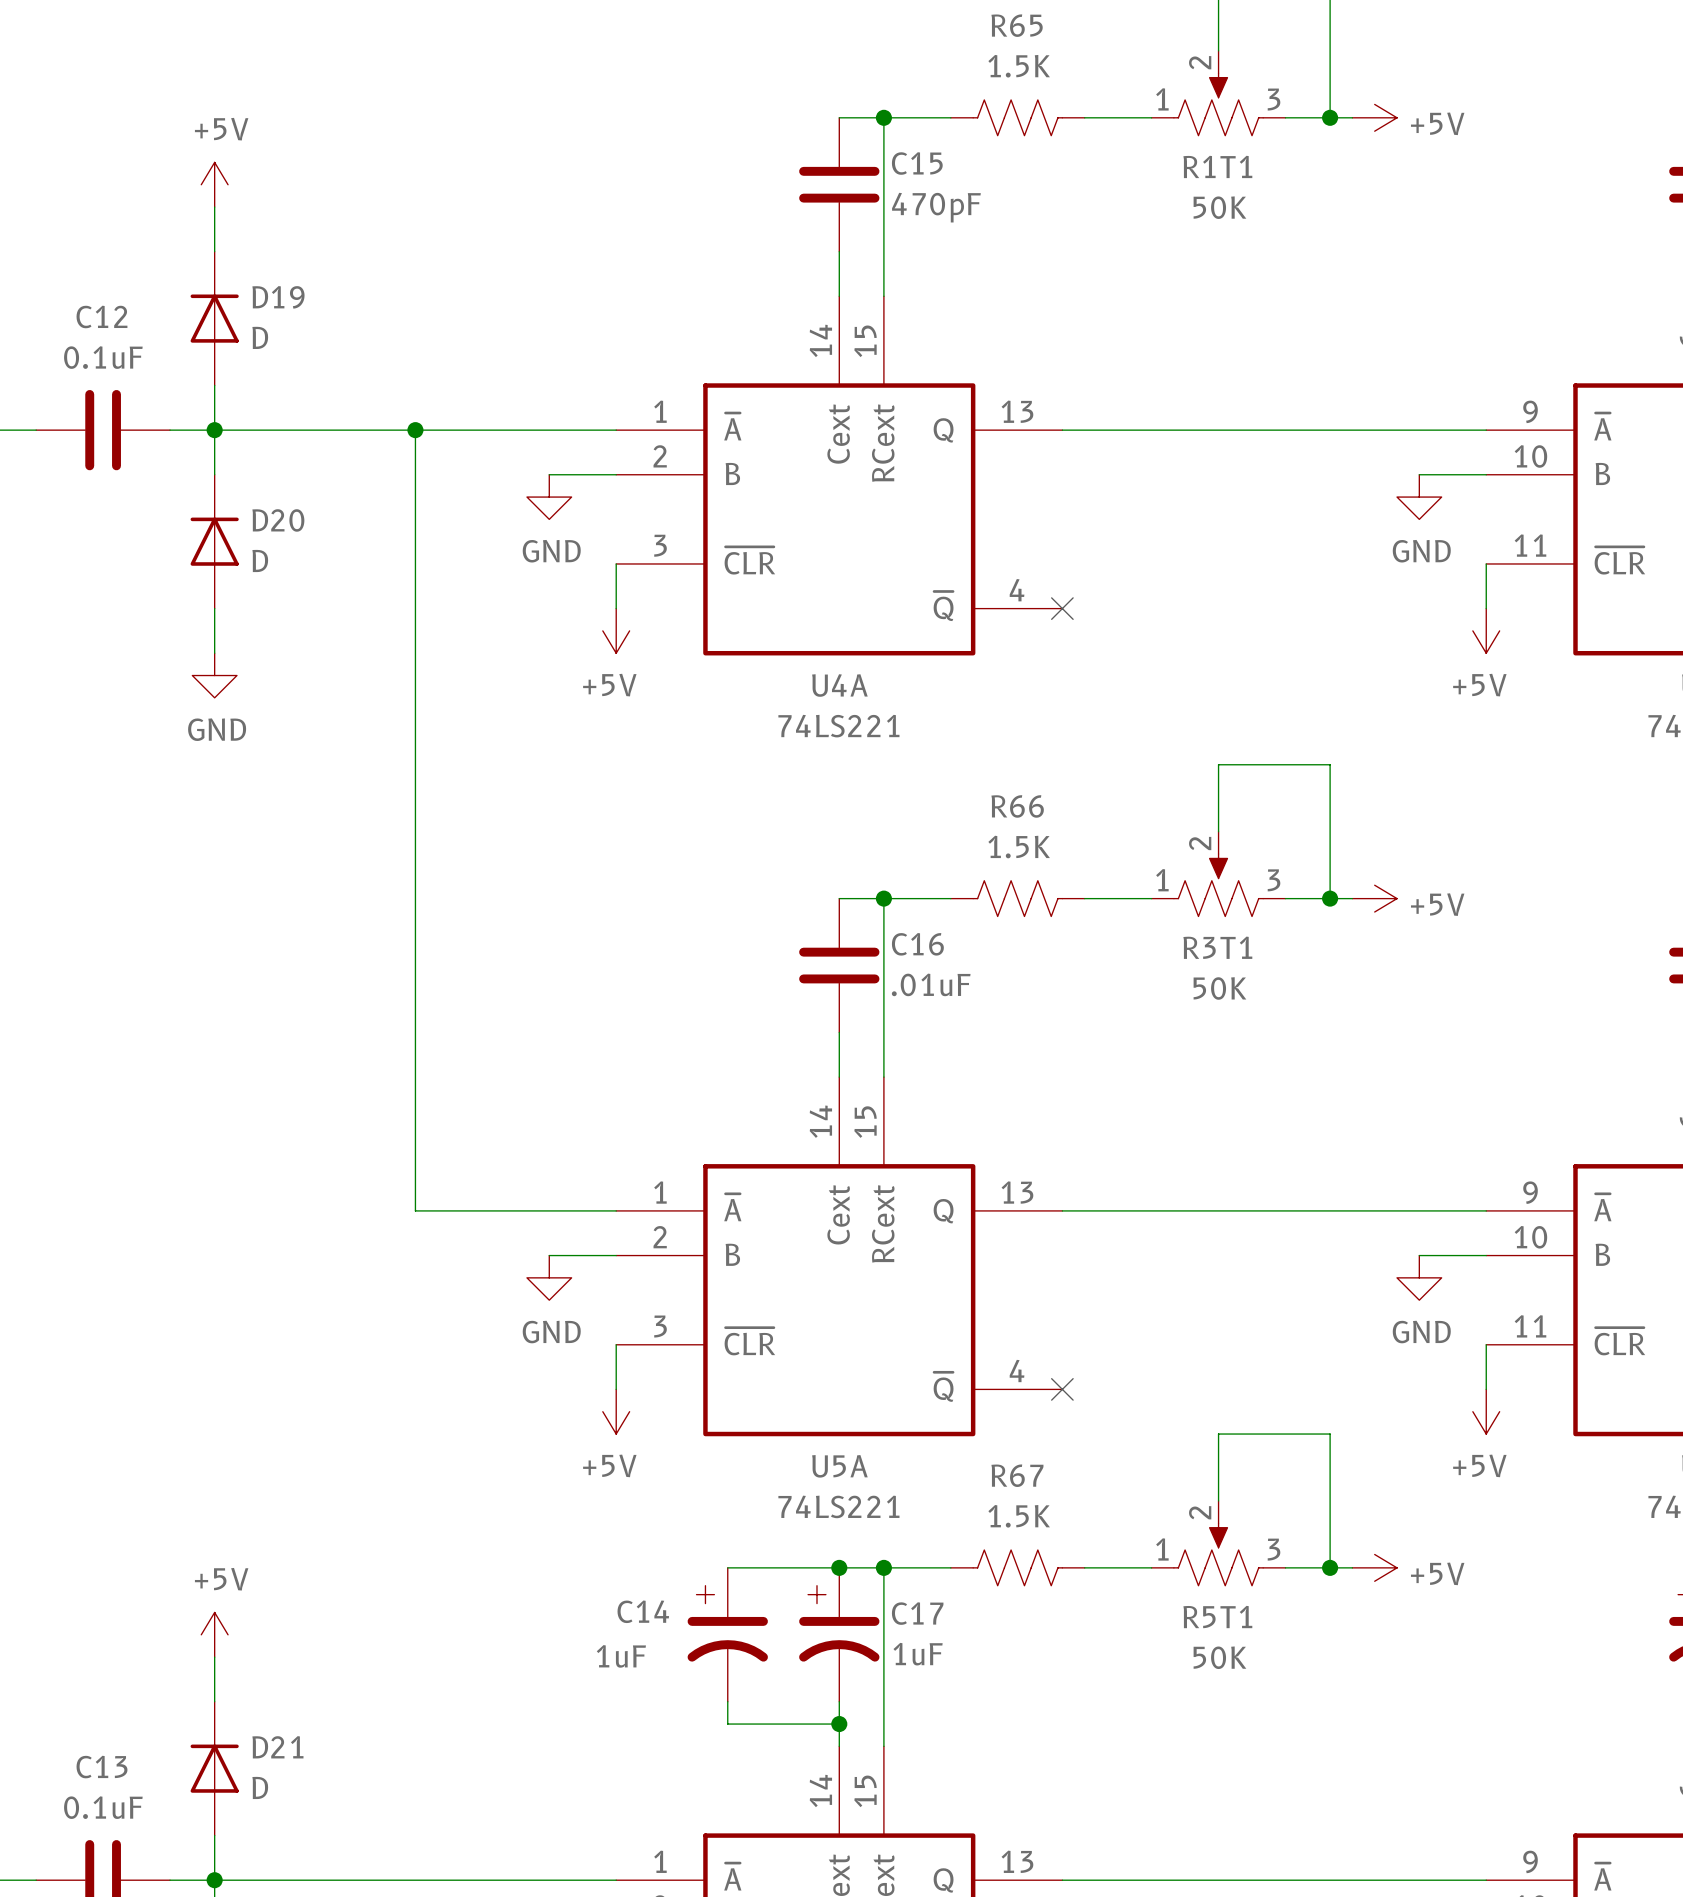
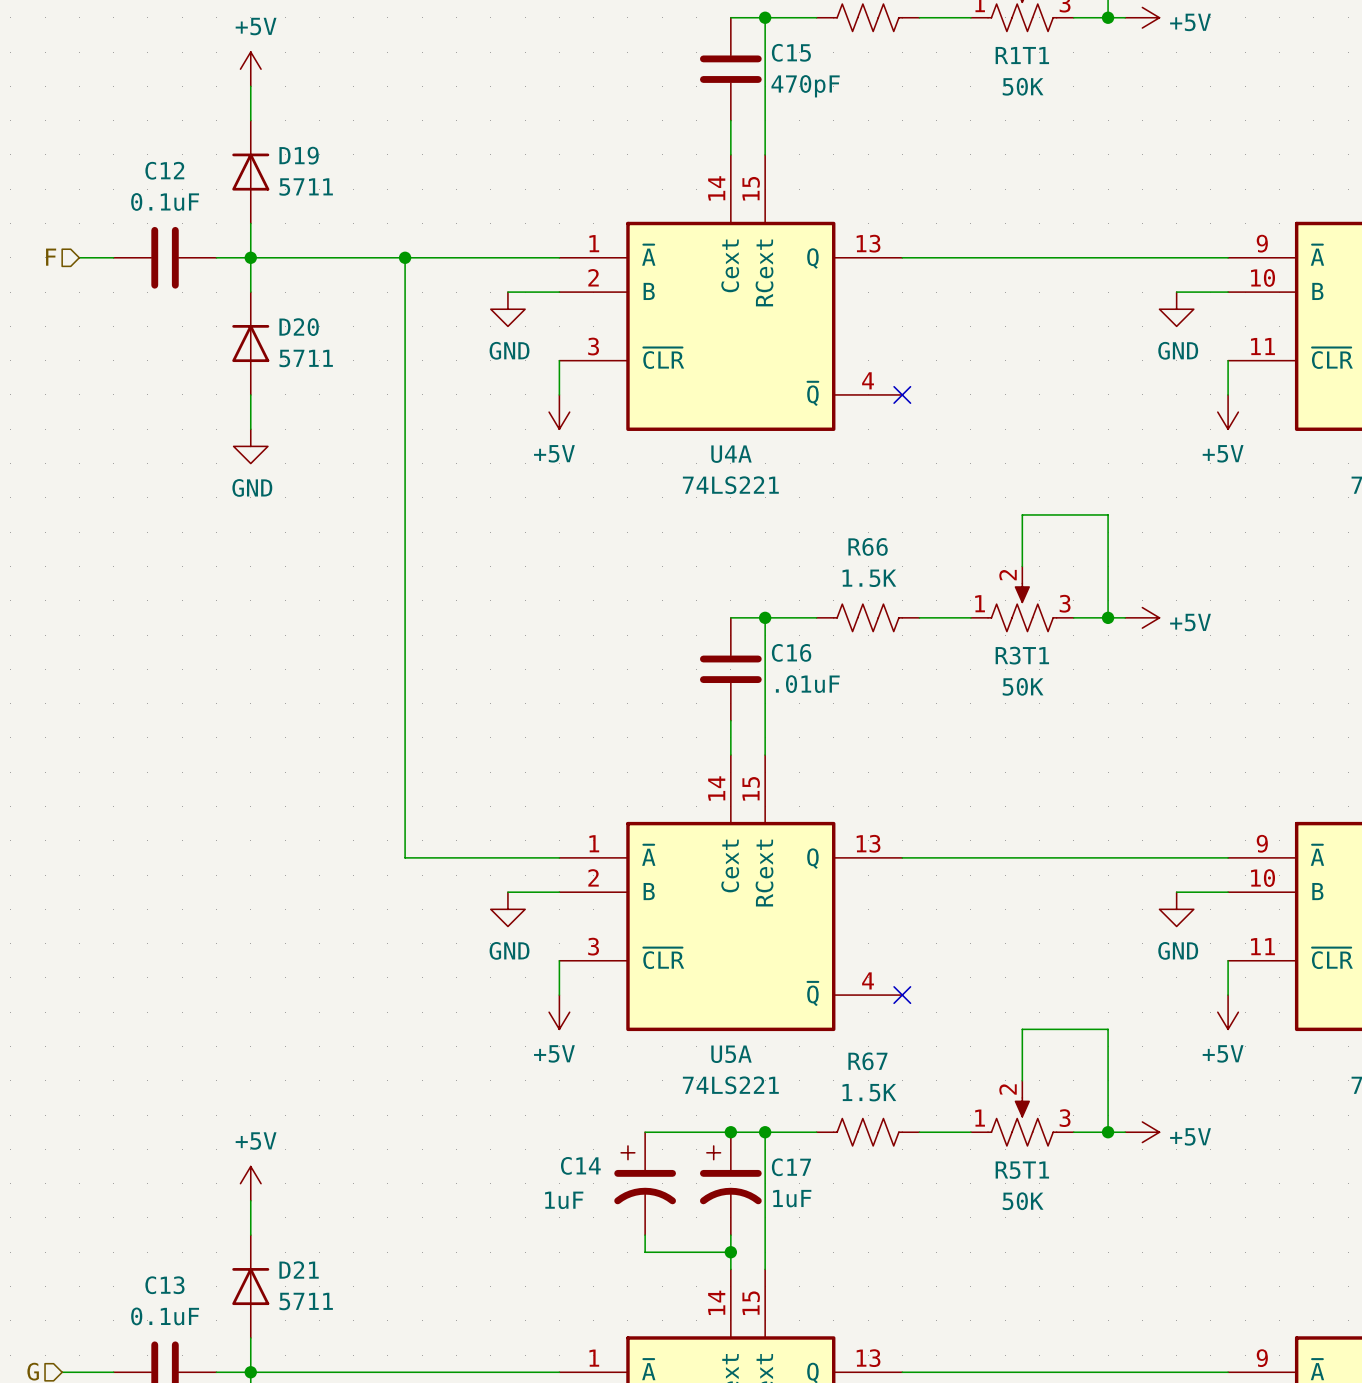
D19 value: D (260, 337) -> 5711 (306, 187)
D20 value: D (260, 560) -> 5711 (306, 358)
D21 value: D (260, 1787) -> 5711 (306, 1301)

